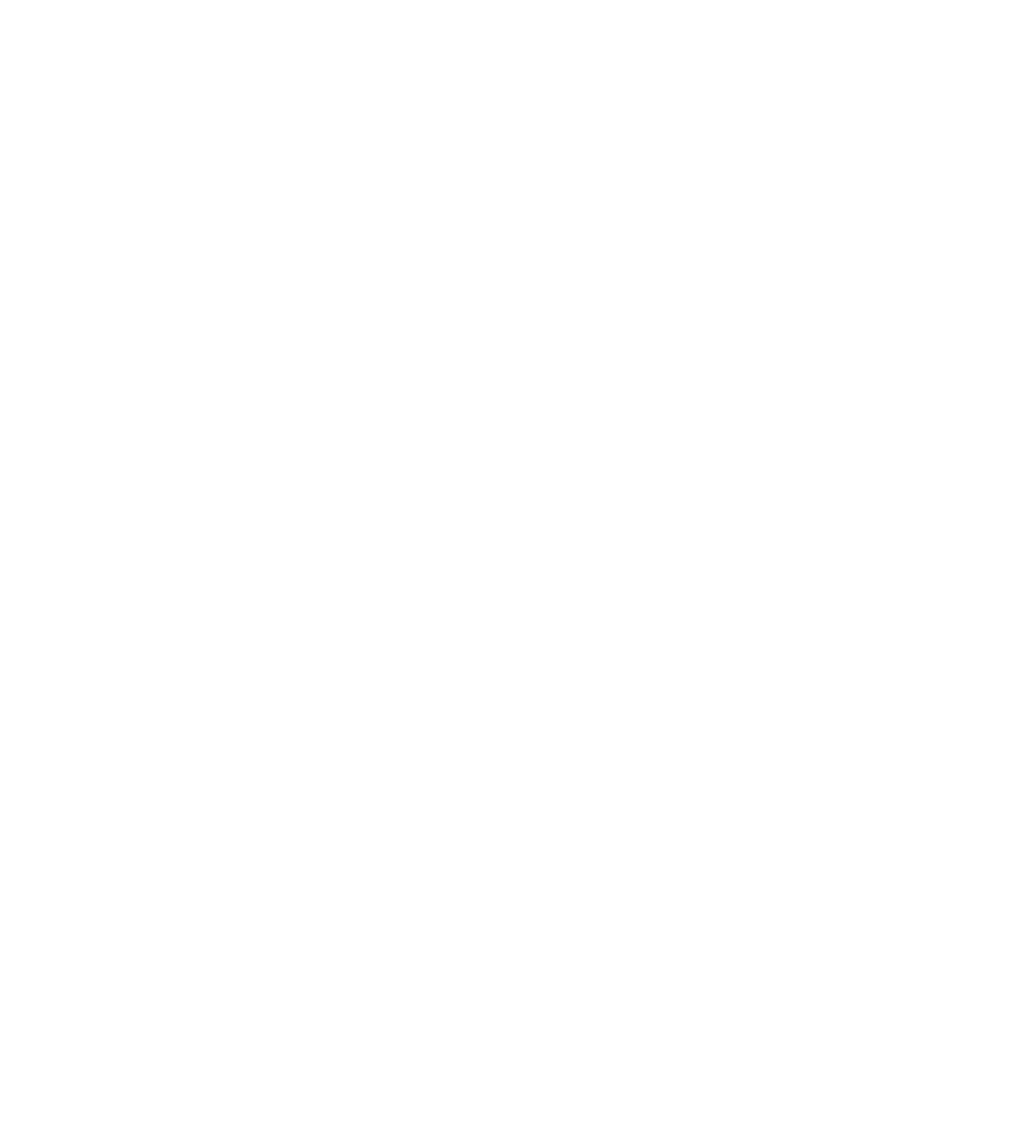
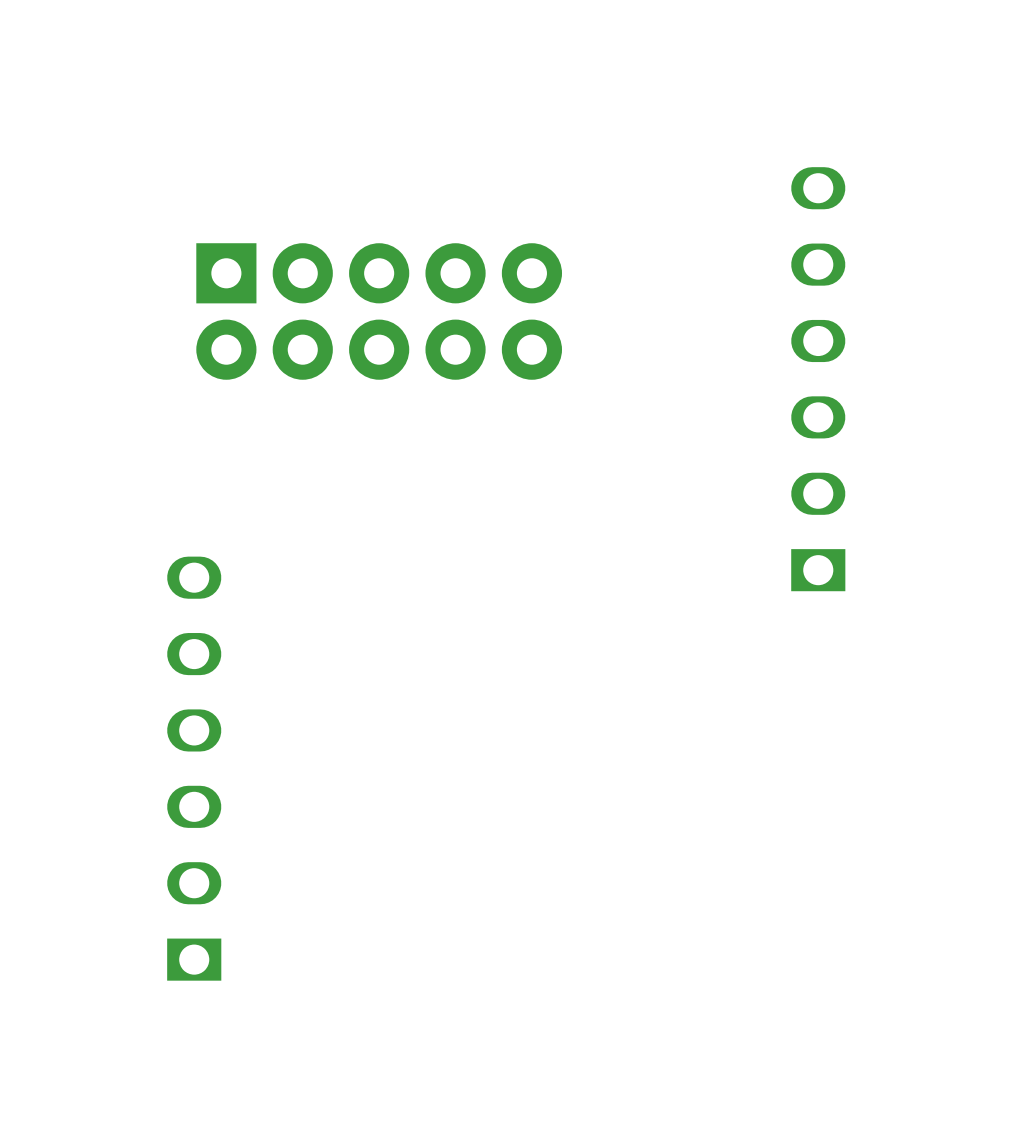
part: none -> (379, 311)
part: none -> (818, 379)
part: none -> (194, 768)

